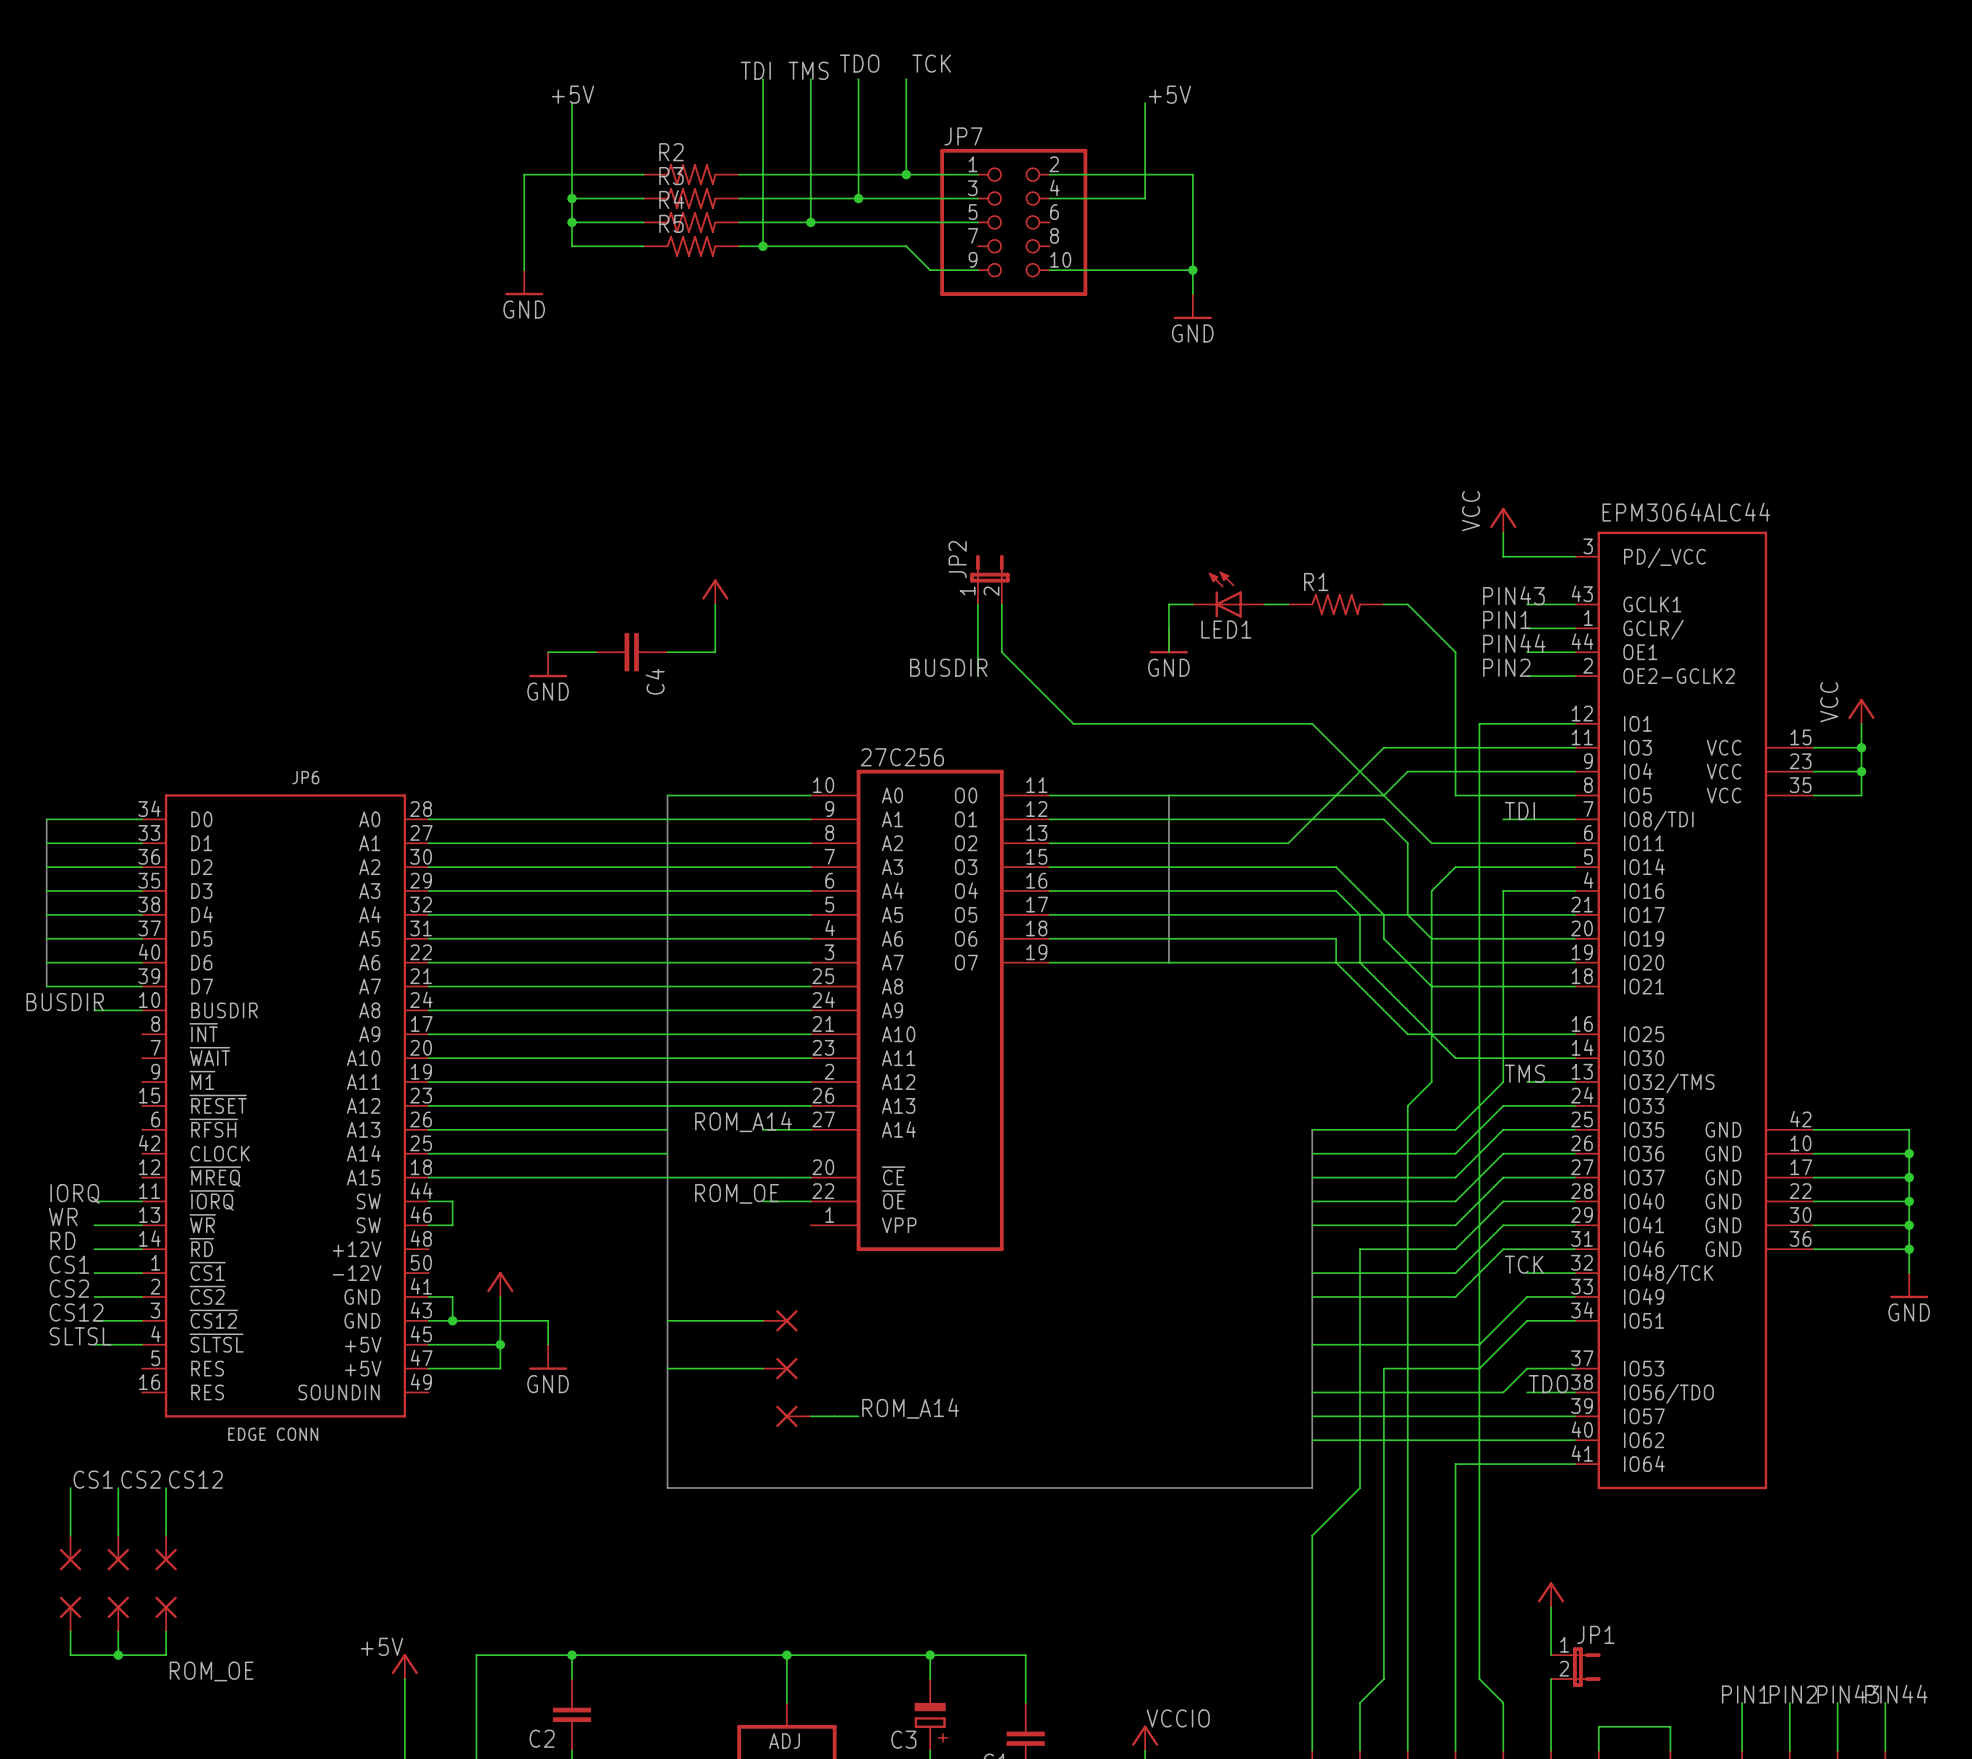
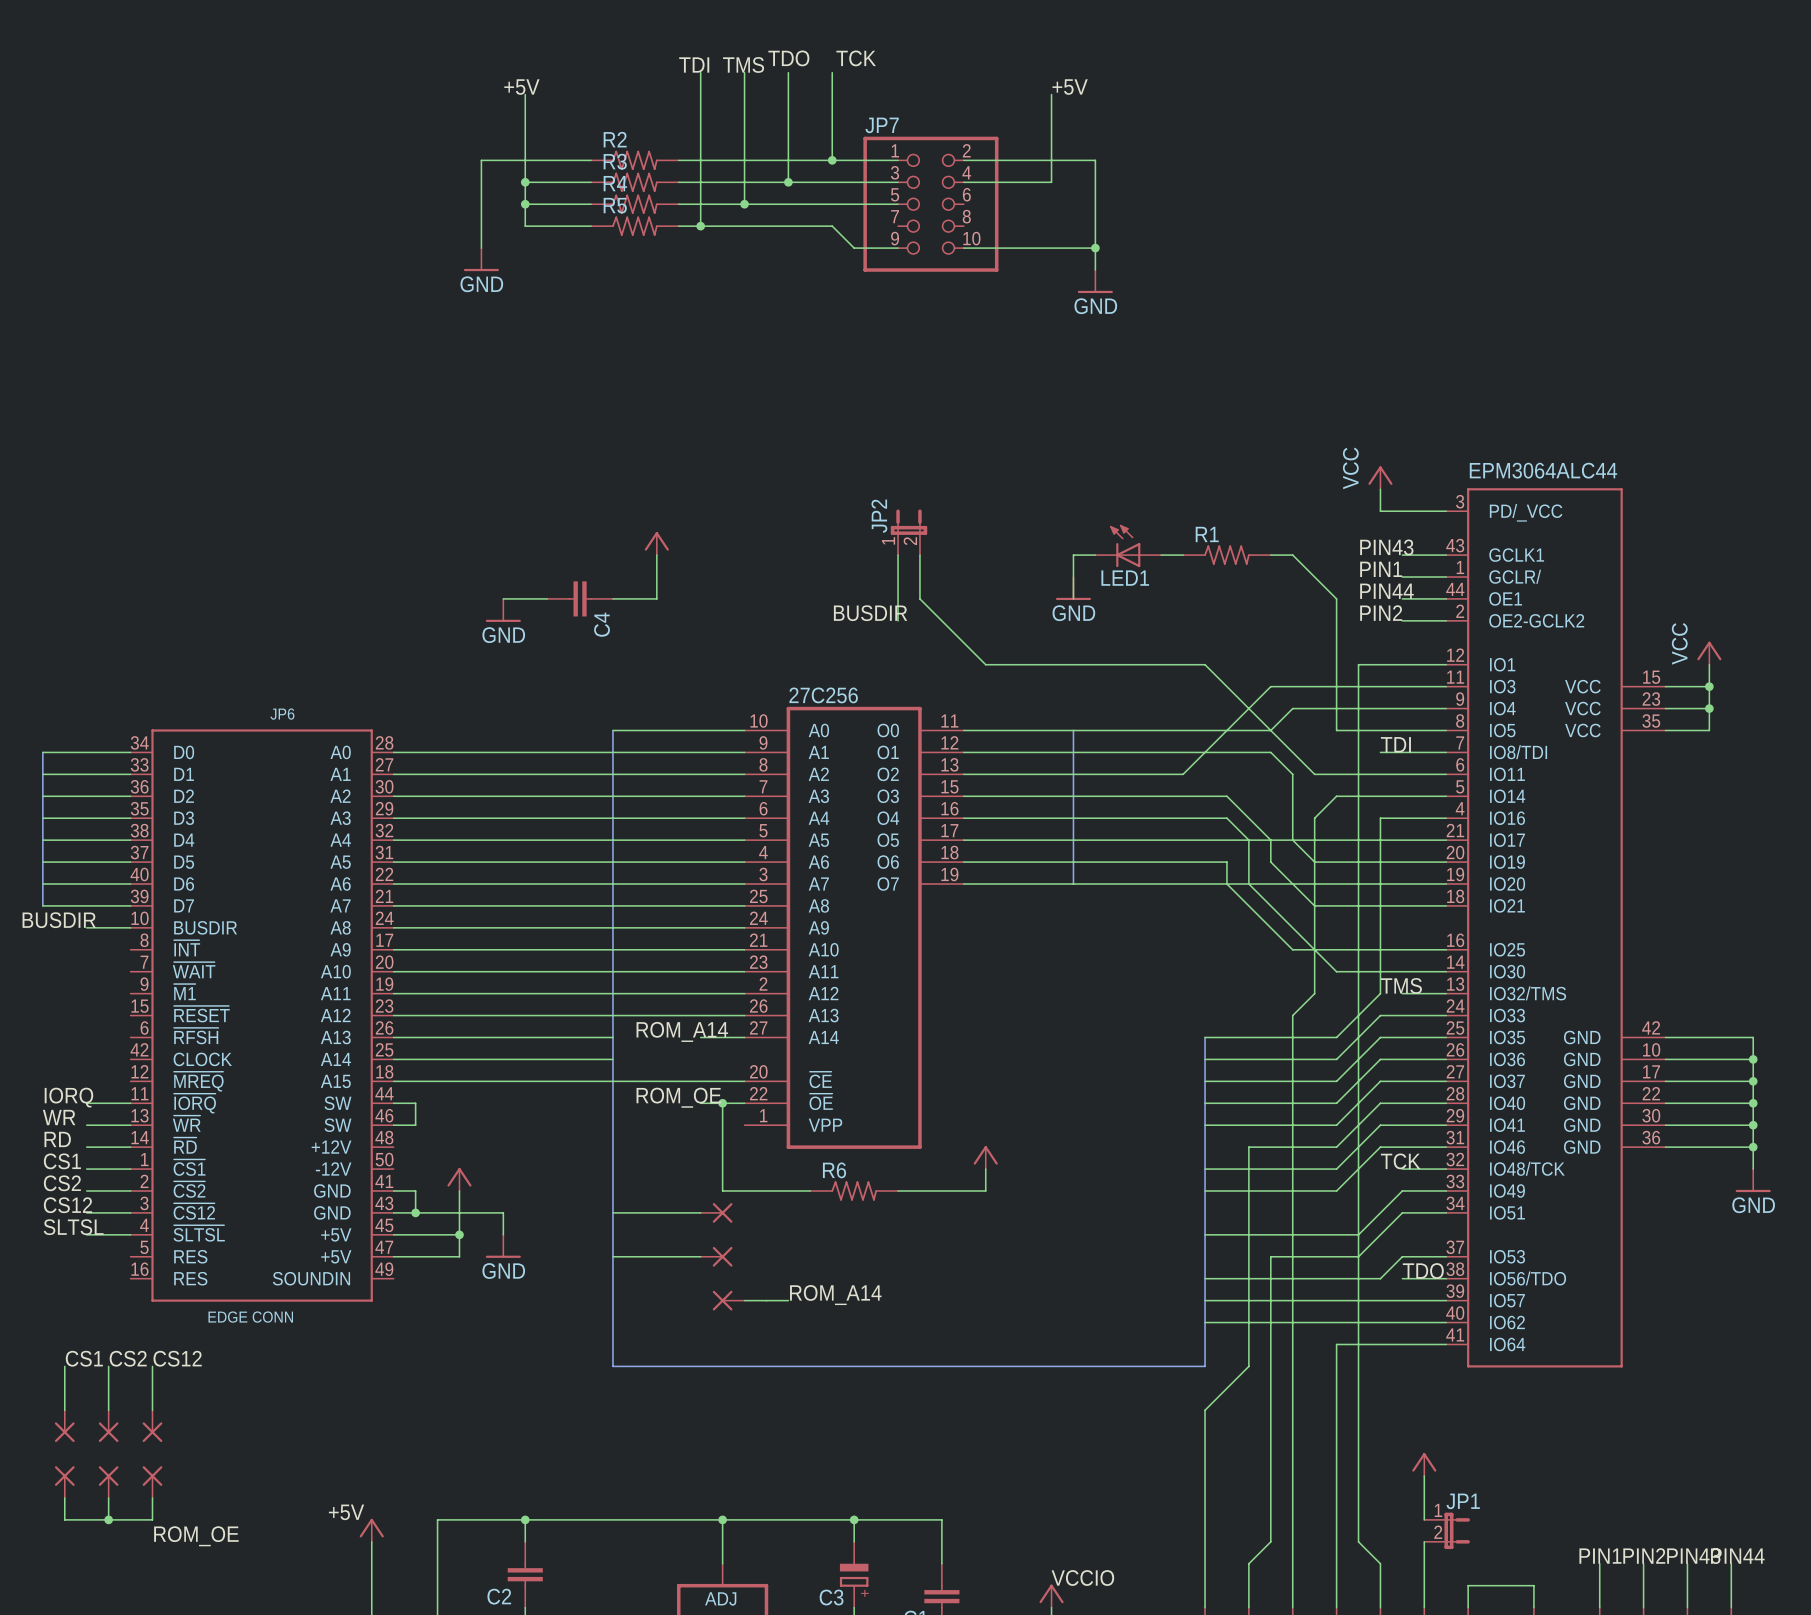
wire: none -> (722, 1103) (722, 1190) (810, 1190)
junction: none -> (722, 1103)
power symbol: none -> (985, 1157)
wire: none -> (985, 1169) (985, 1190) (898, 1190)
R6: none -> (854, 1190)

